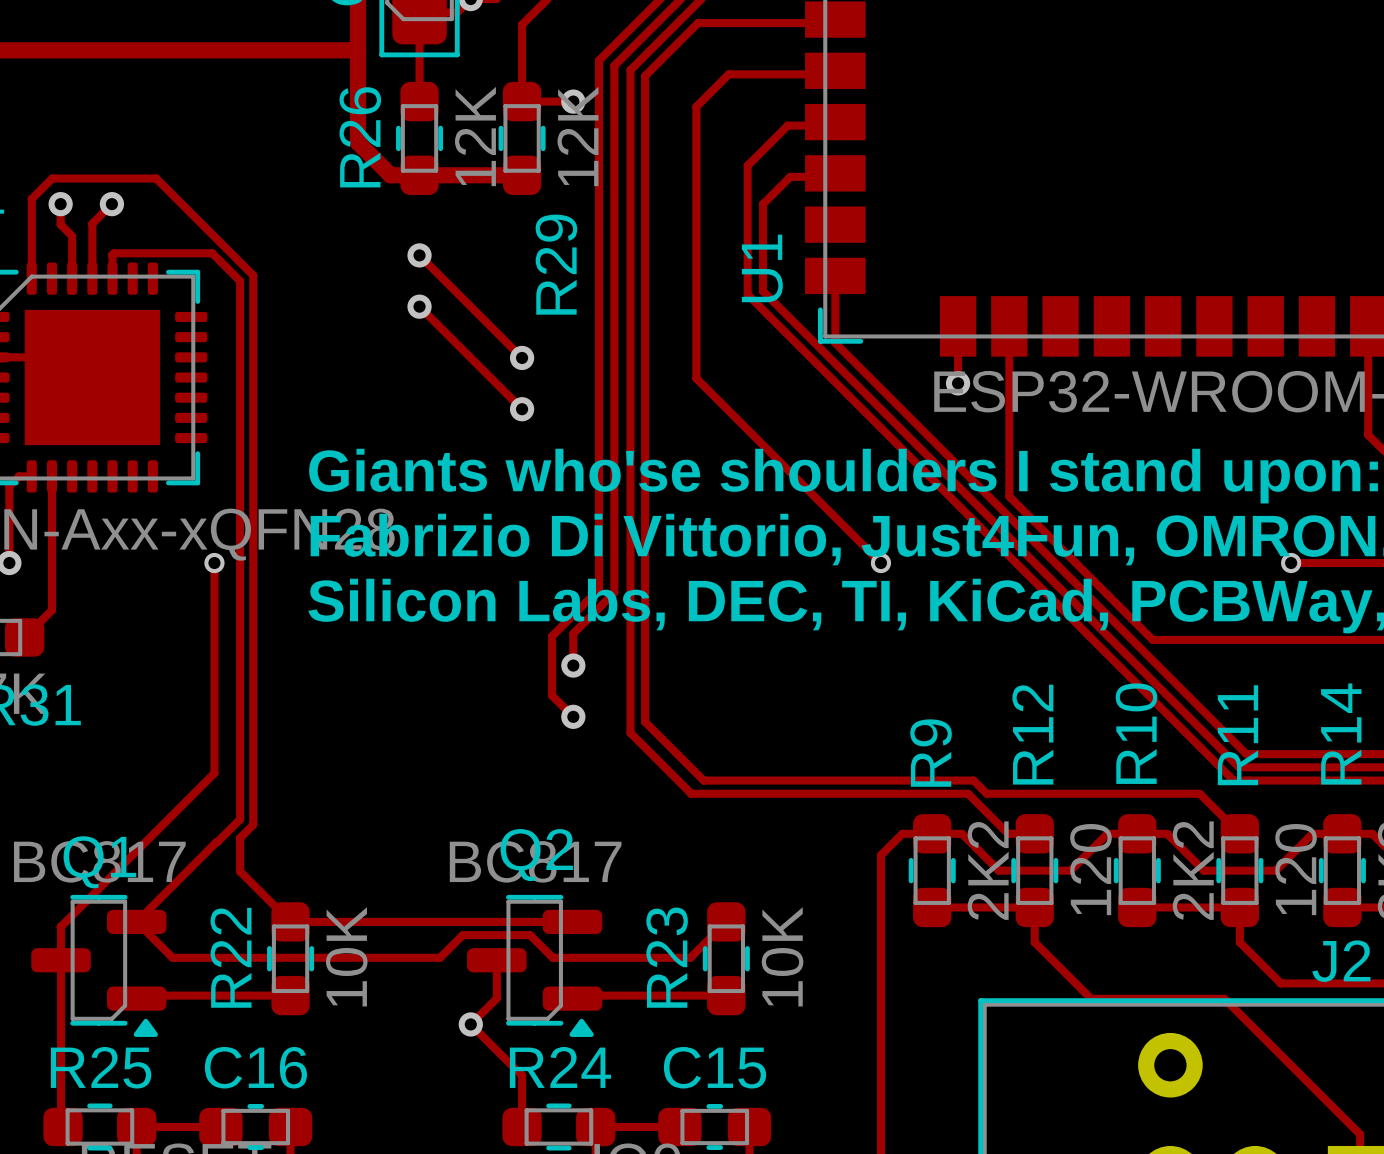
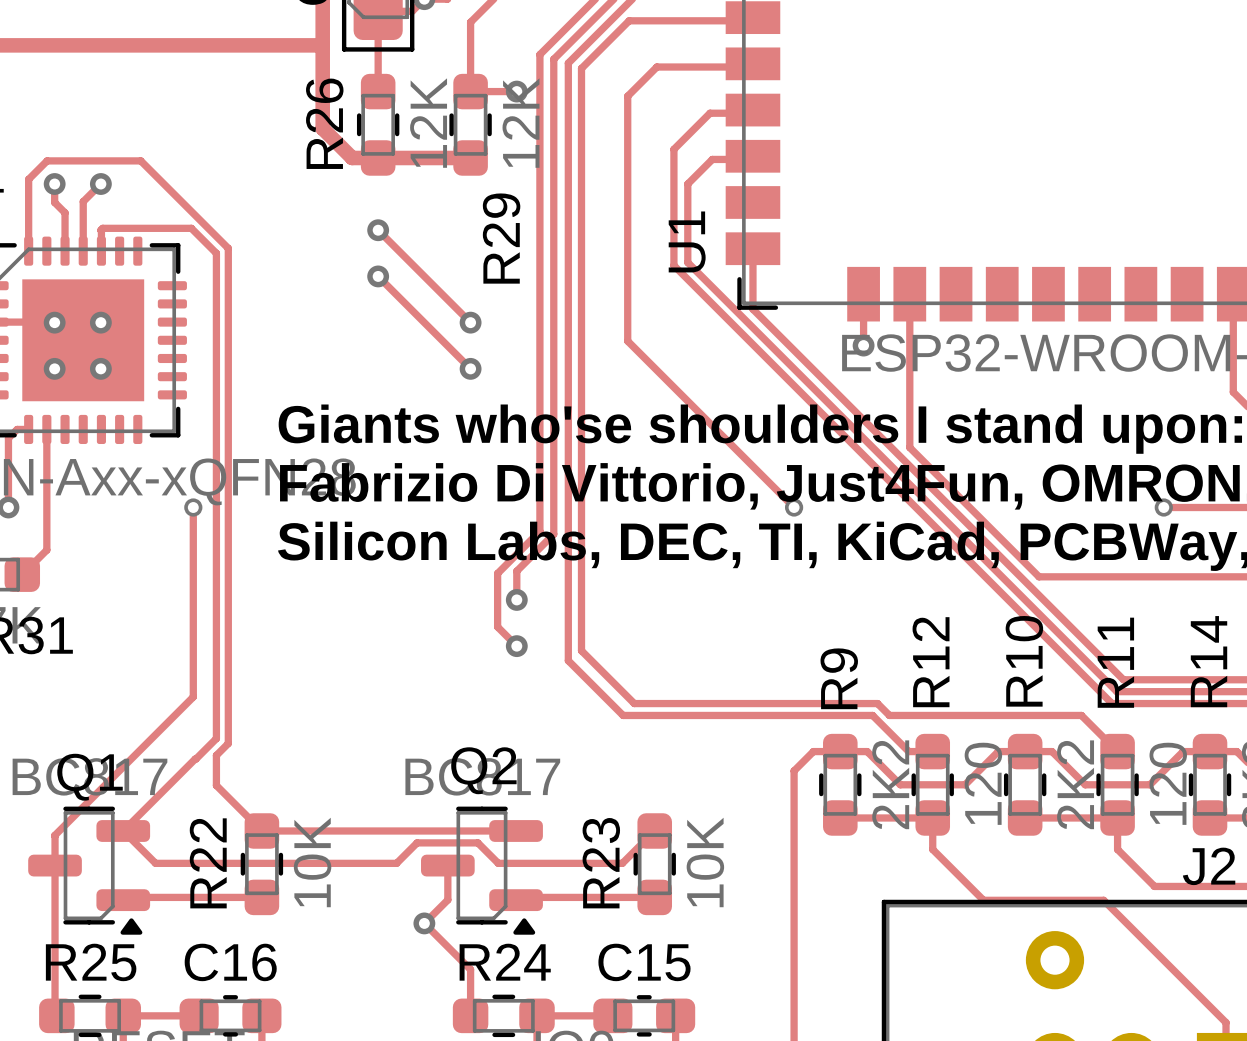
via: none -> (54, 322)
via: none -> (100, 322)
via: none -> (54, 368)
via: none -> (100, 368)

